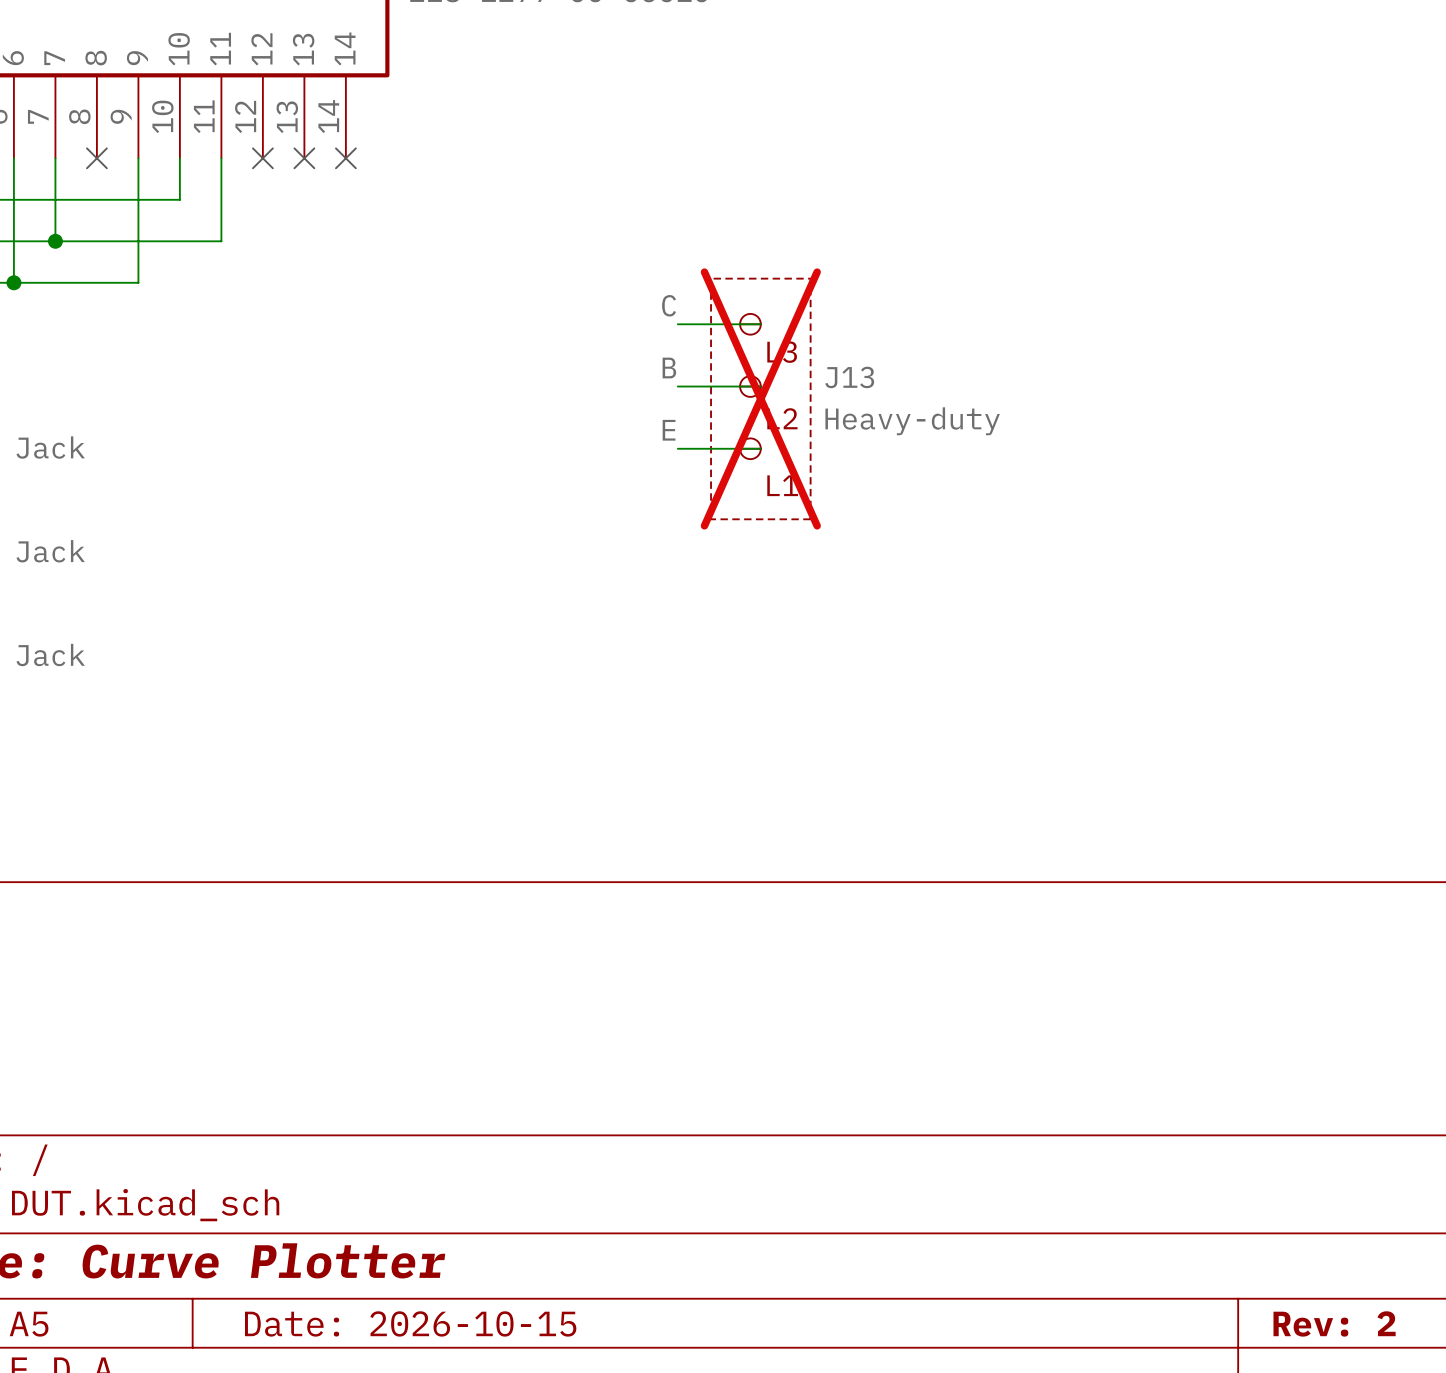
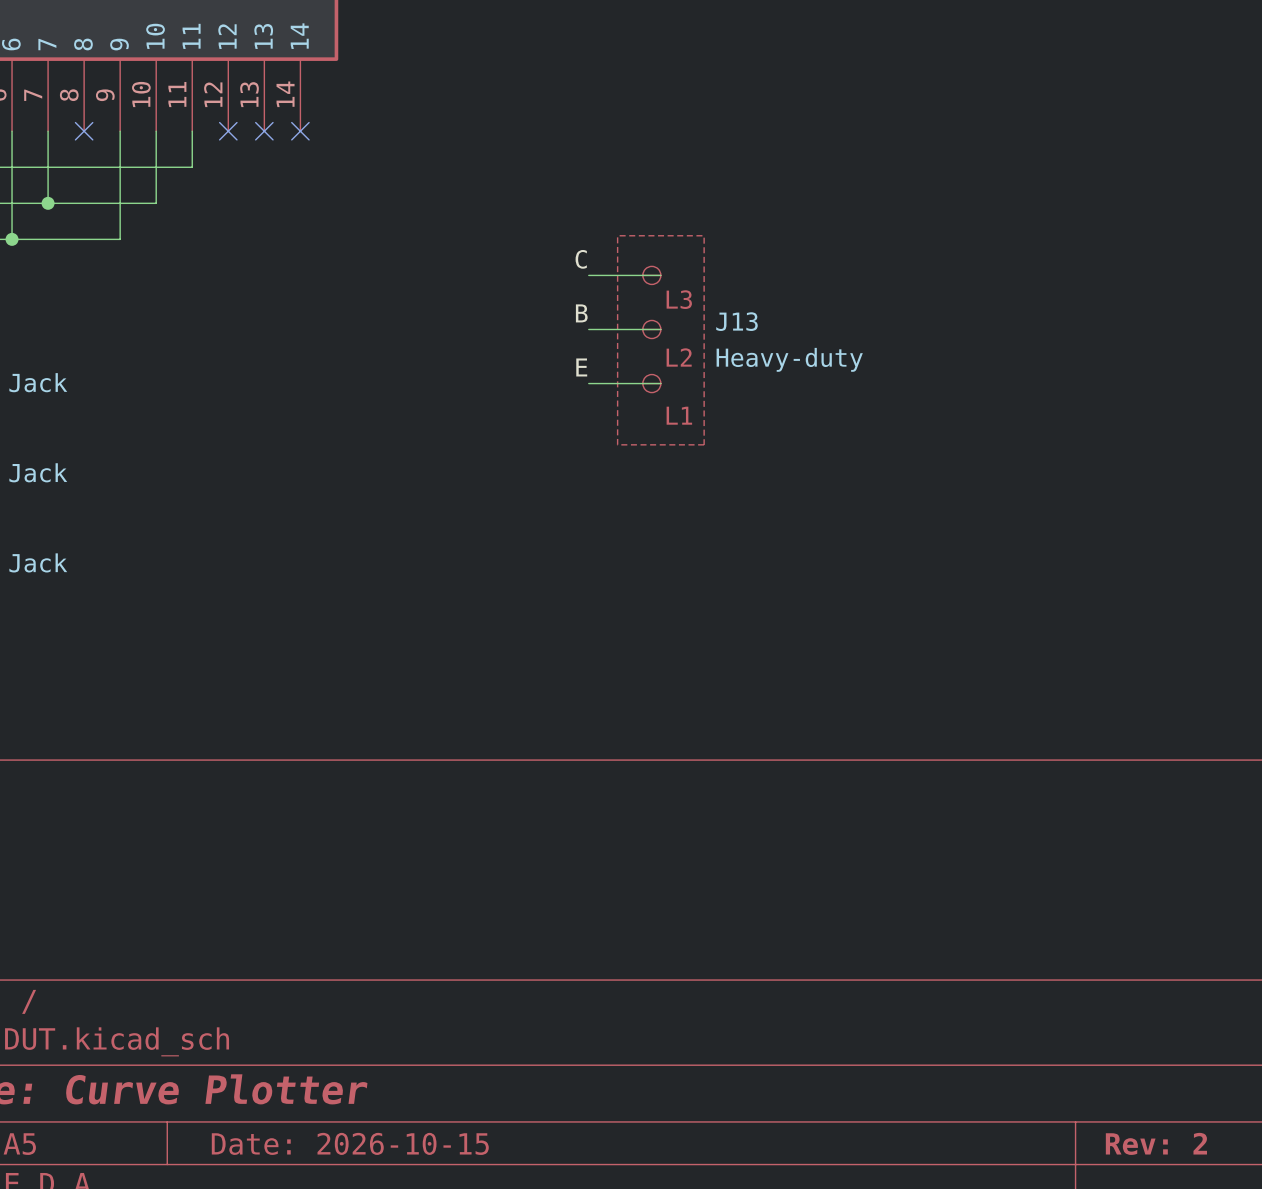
wire: (221, 199) (221, 241) (179, 241) -> (192, 167) (156, 167) (156, 203)
J13 do-not-place cross: (760, 398) -> none

